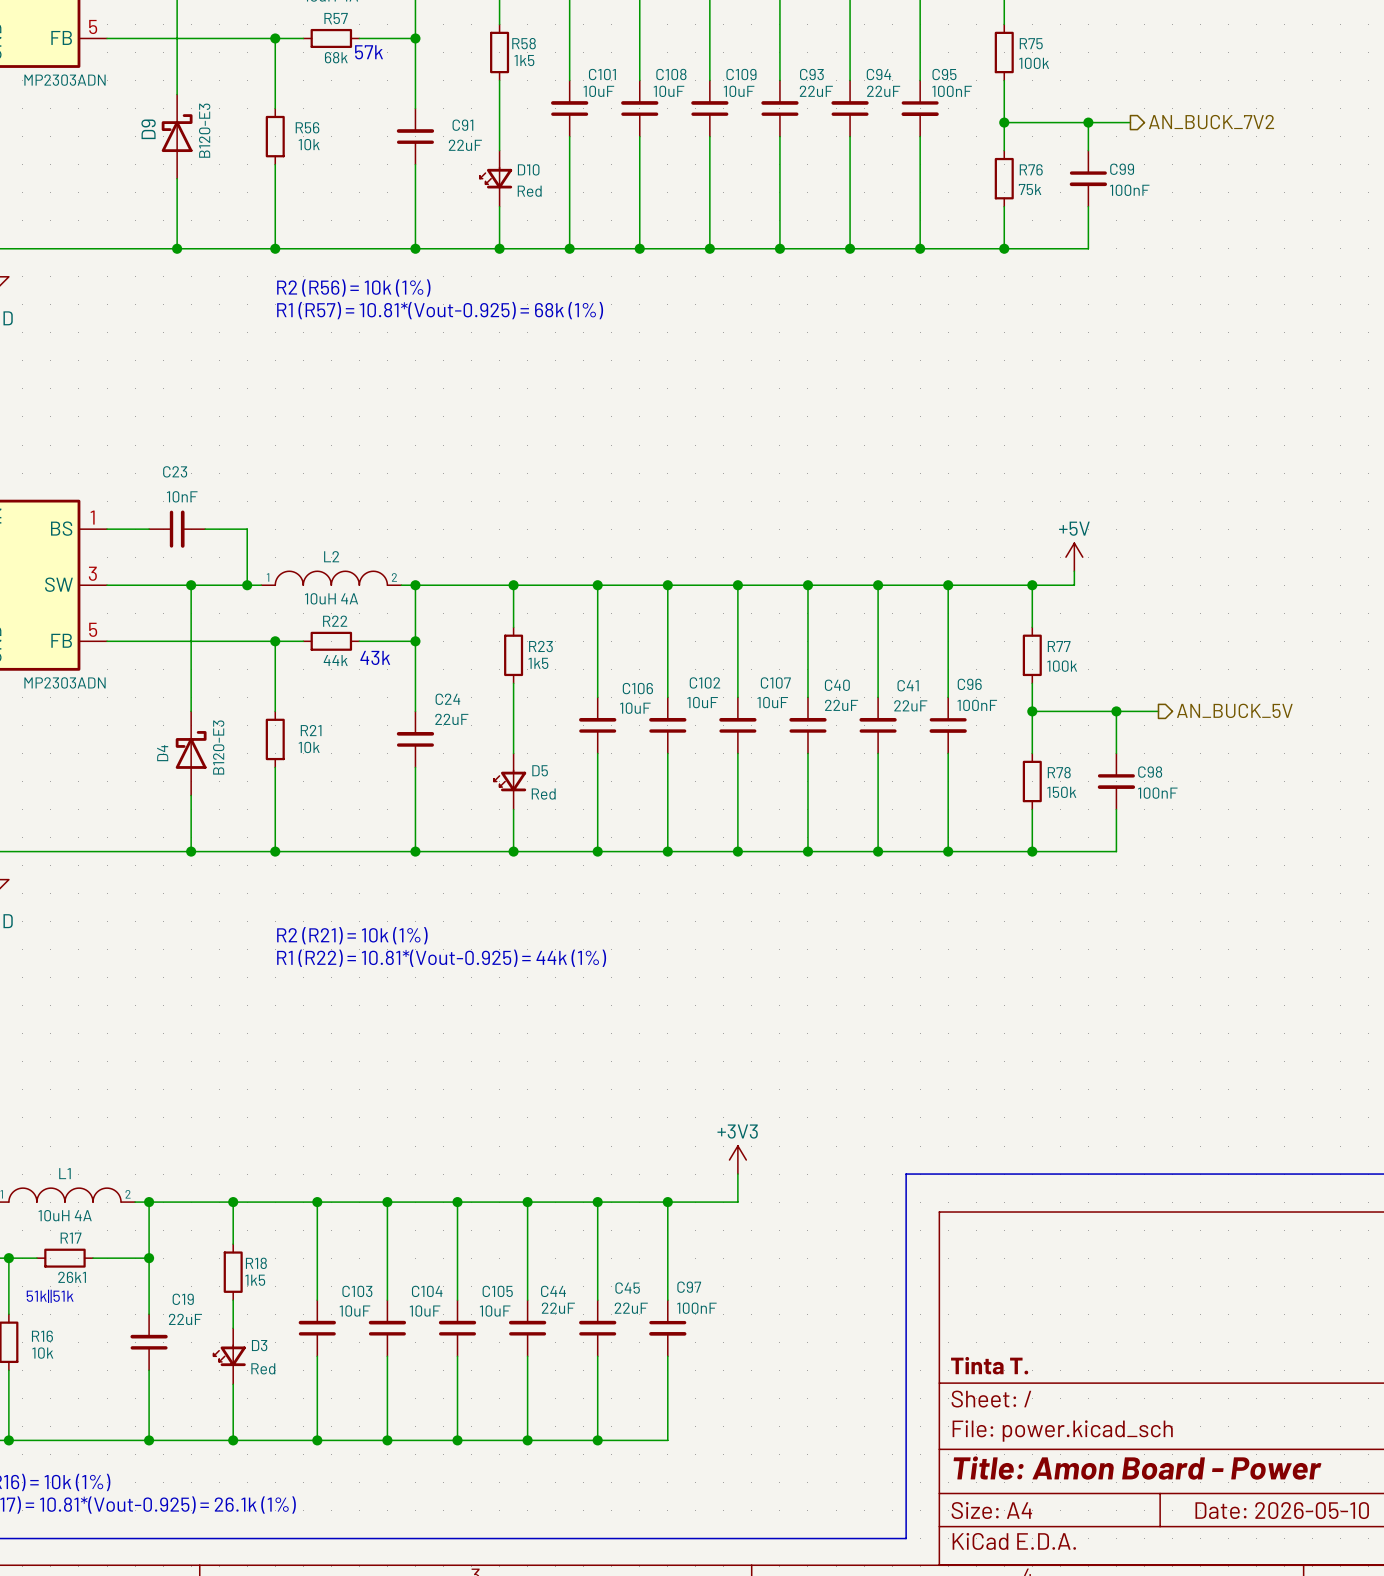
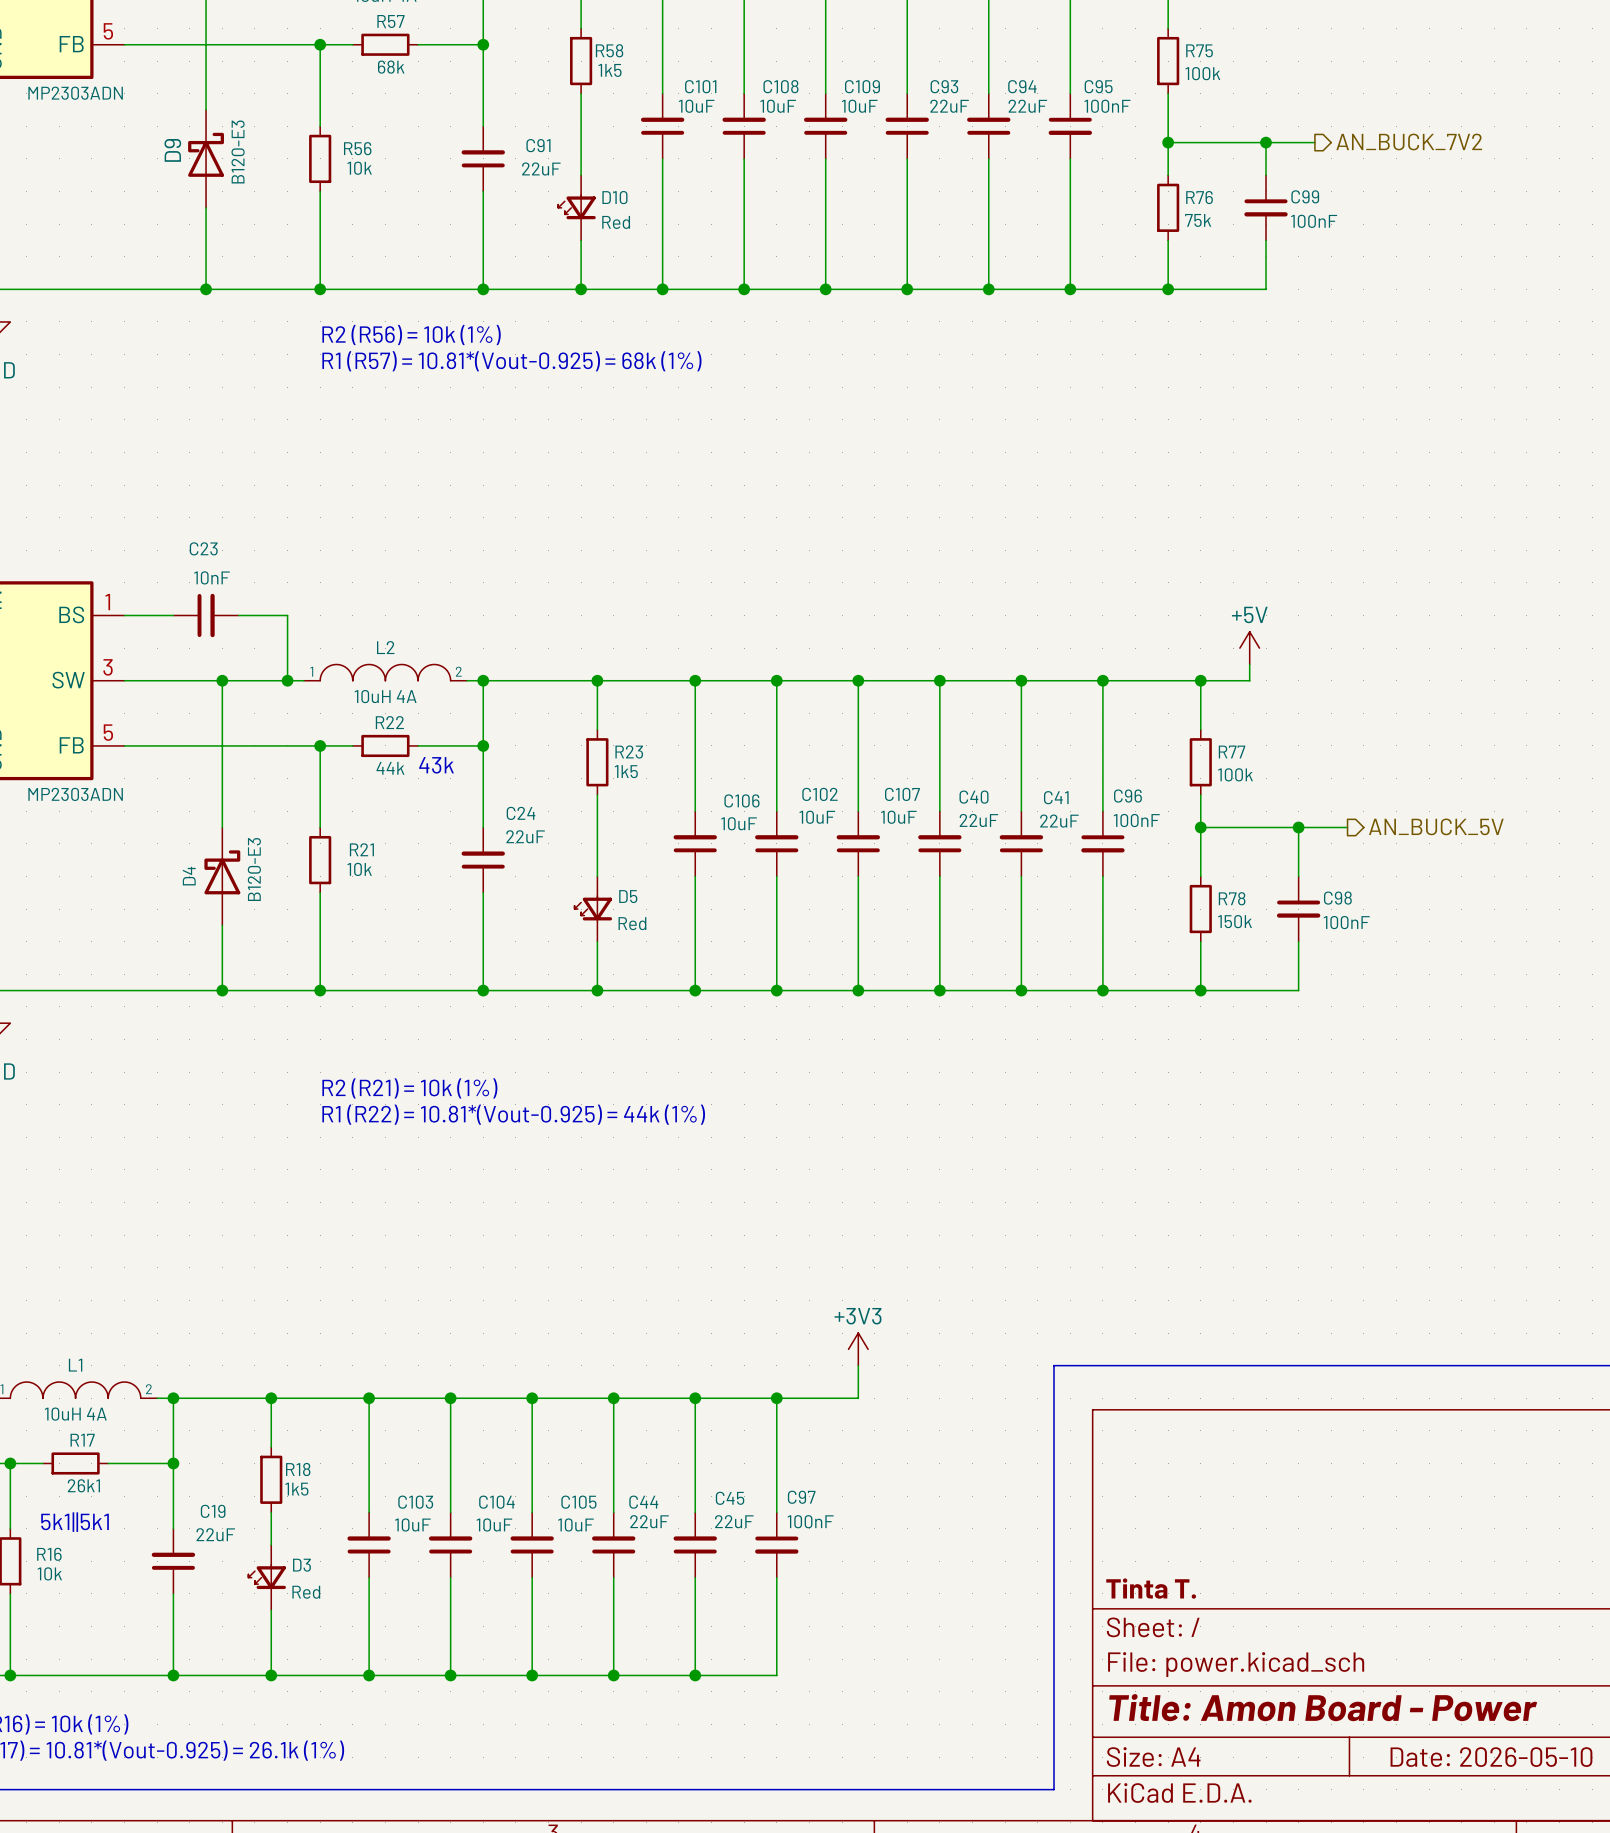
text: 57k (369, 52) -> none
text: 51k||51k (50, 1296) -> 5k1||5k1 (75, 1522)

